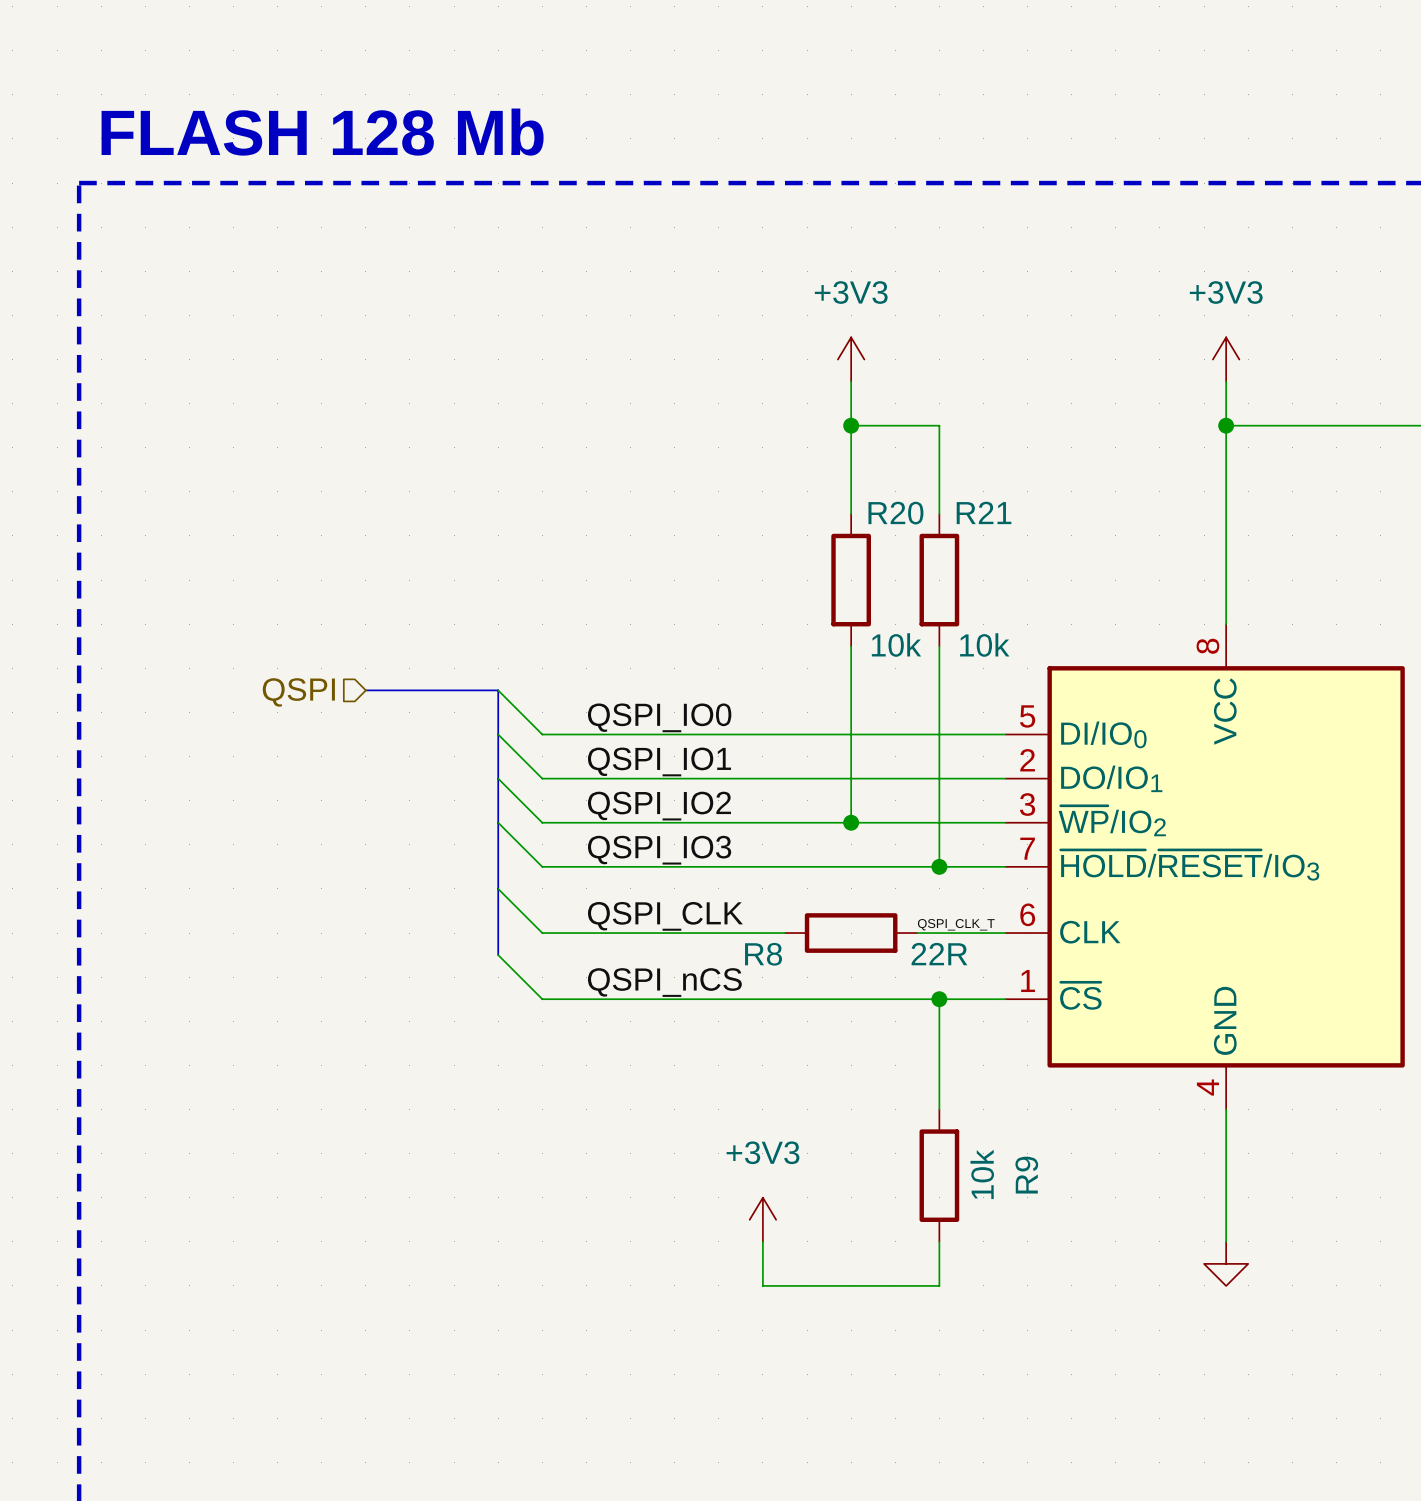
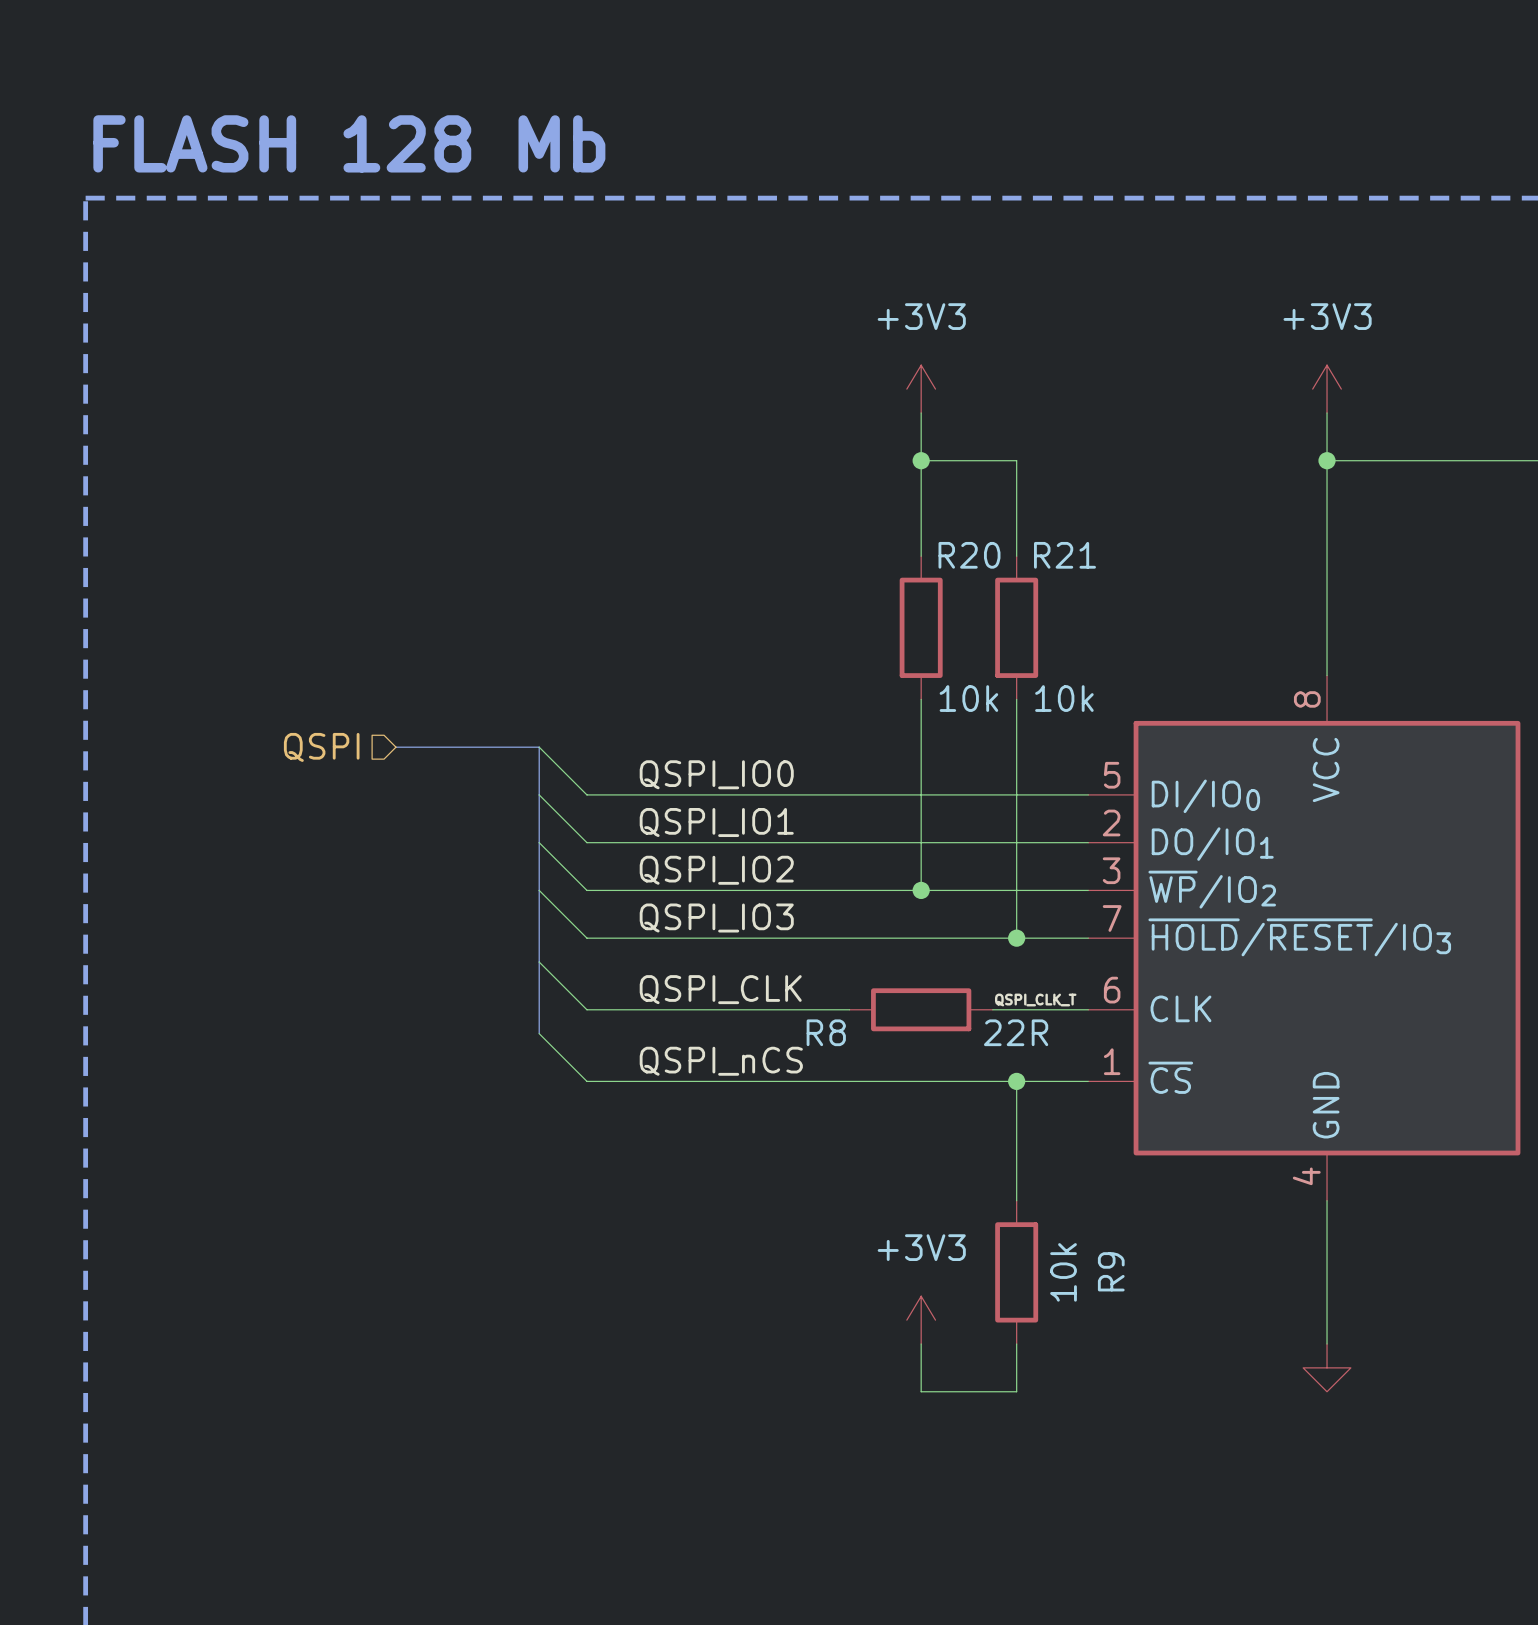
power symbol position: +3V3 (762, 1219) -> +3V3 (921, 1320)
wire: (762, 1241) (762, 1285) (851, 1285) -> (921, 1344) (921, 1391)

